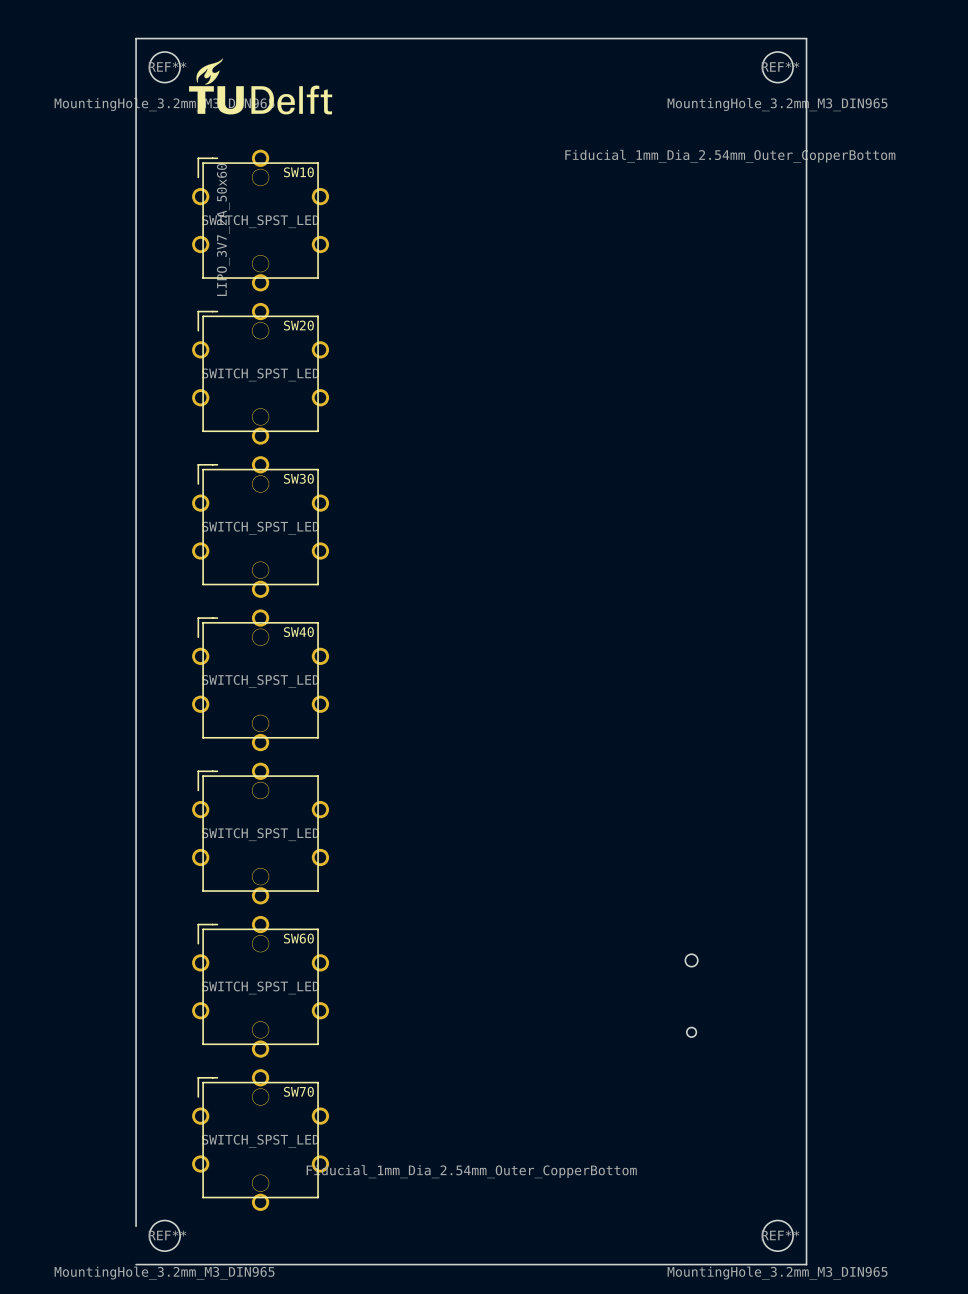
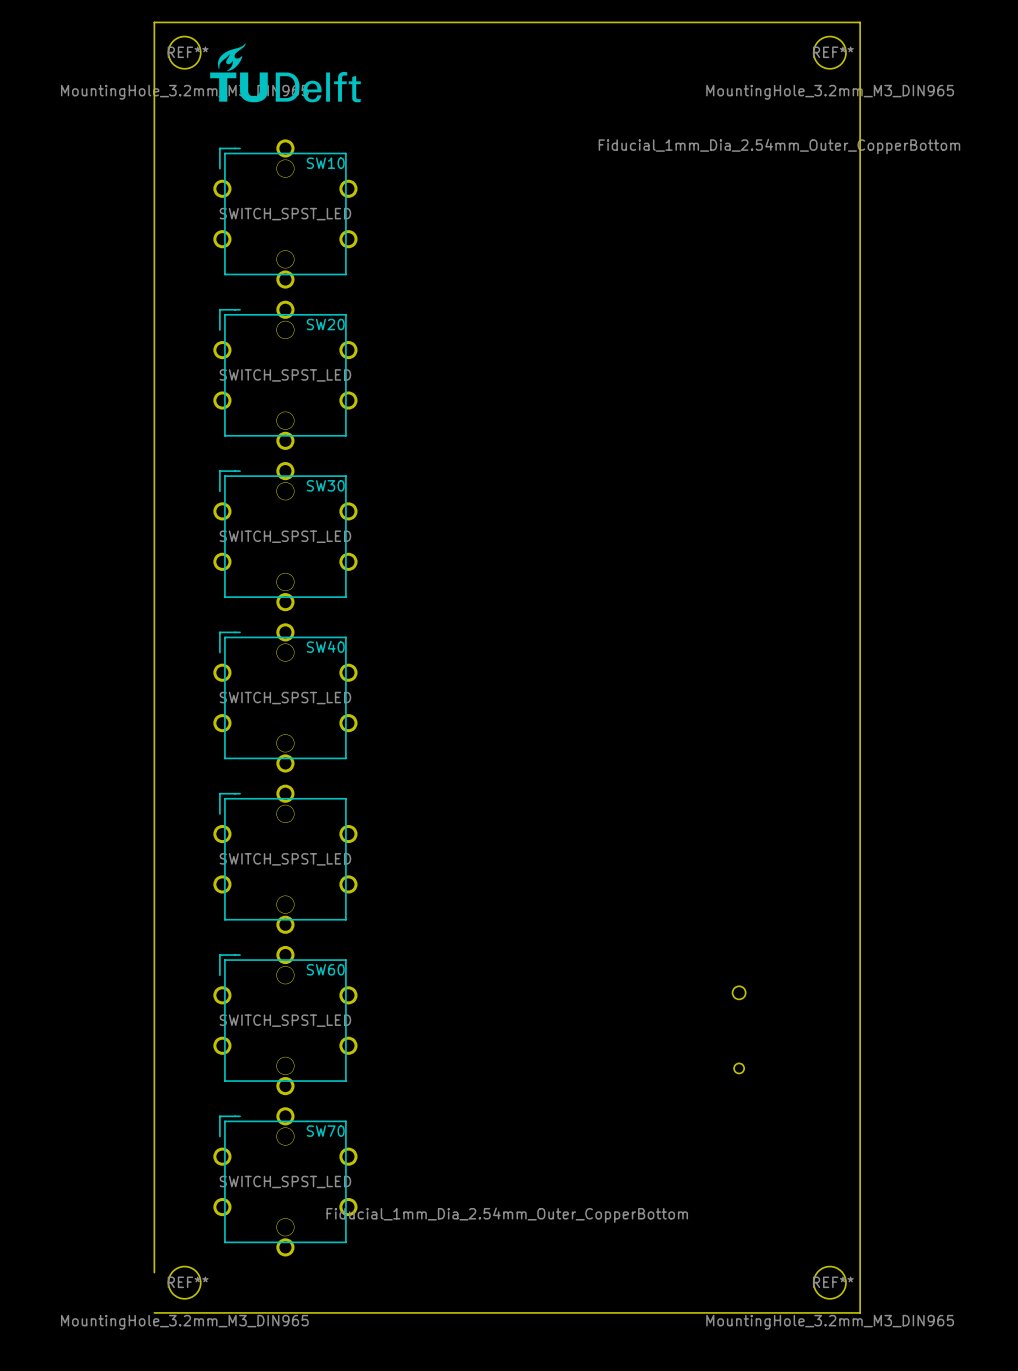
drawing: [216, 163, 230, 296] -> none

